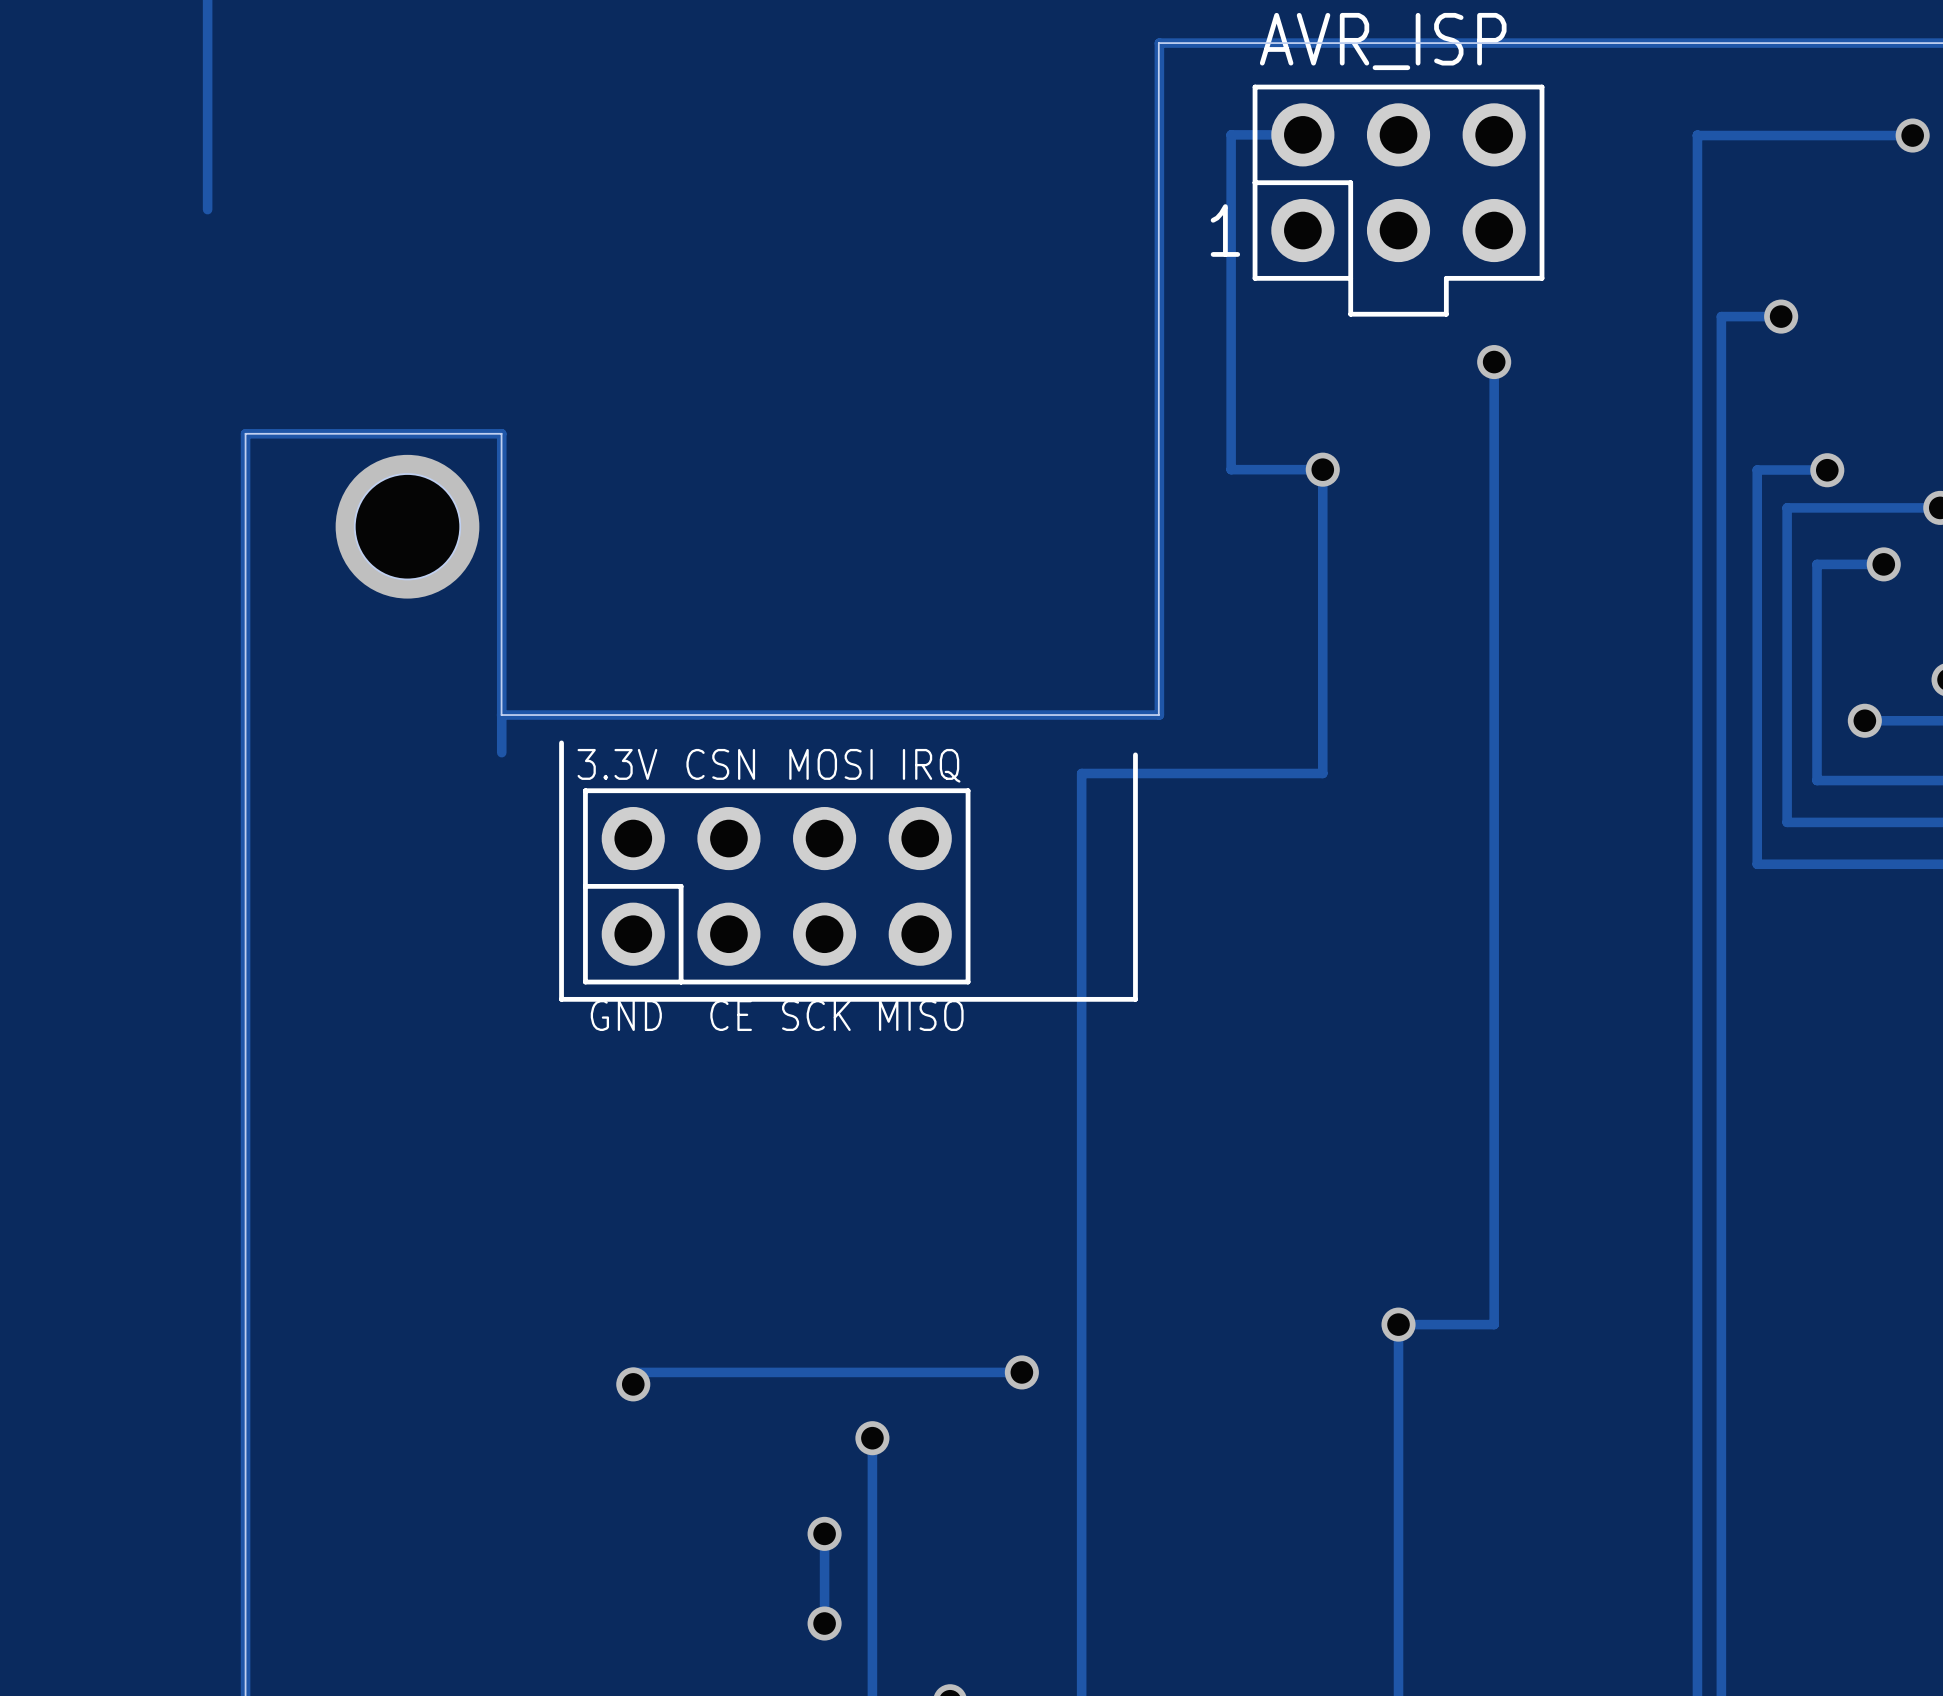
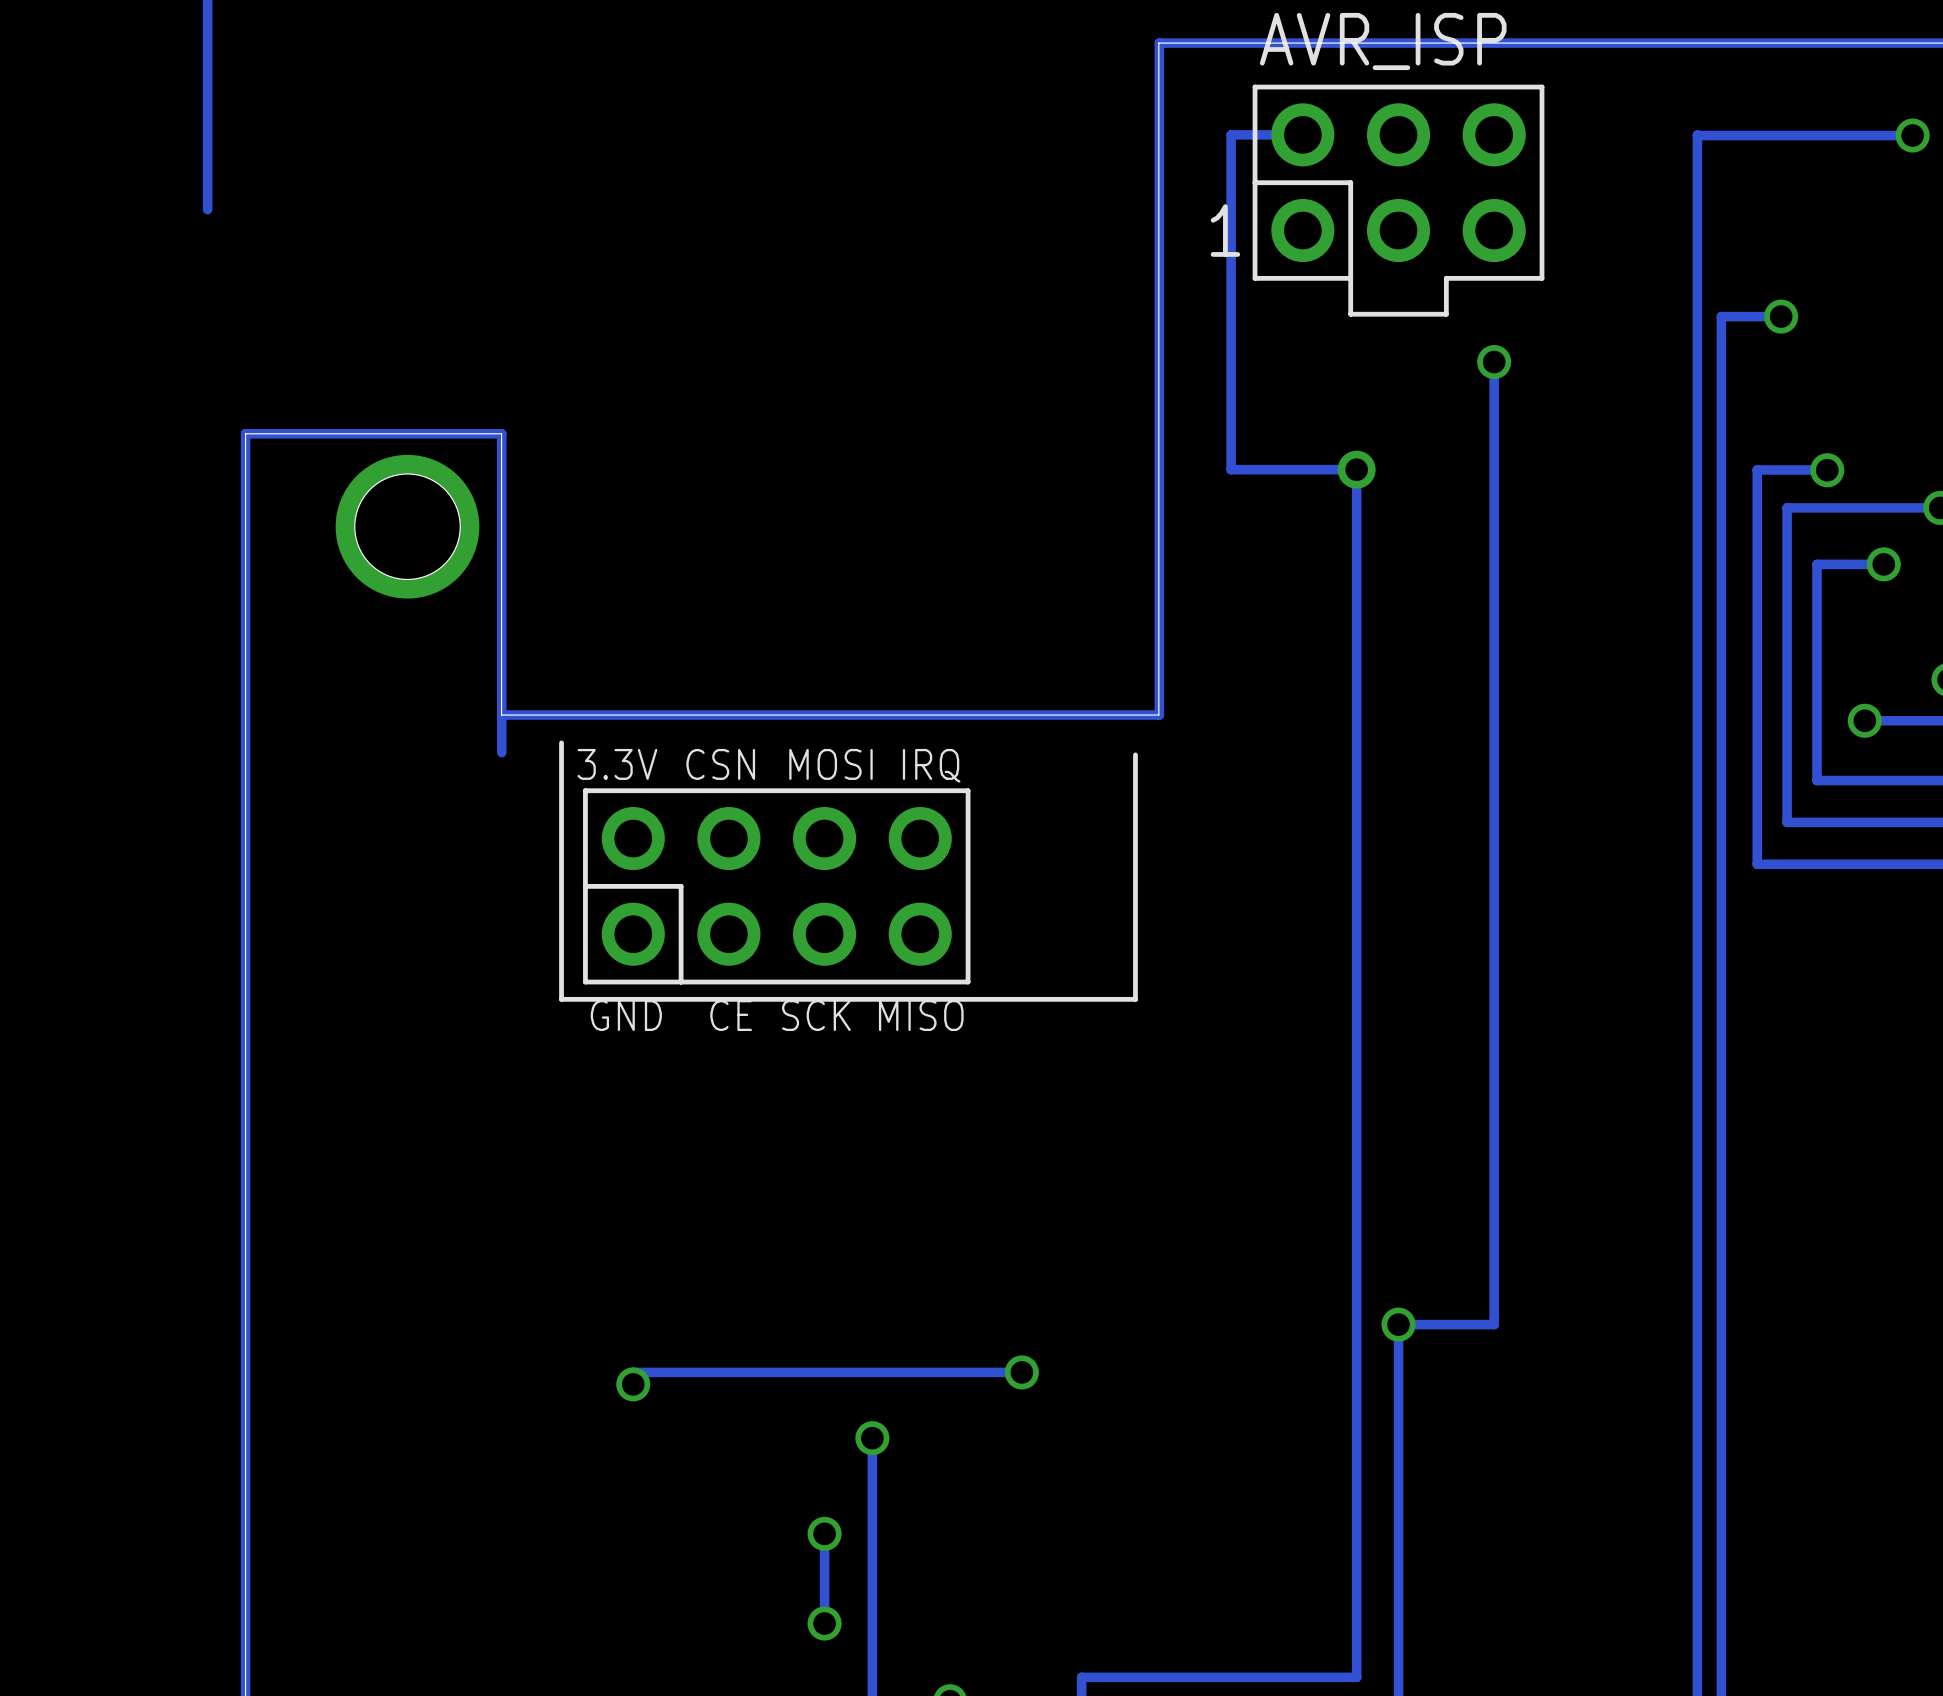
track: (1322, 469) (1322, 773) (1081, 773) (1081, 1677) -> (1322, 469) (1356, 469) (1356, 1677) (1081, 1677)
via position: (1322, 469) -> (1356, 469)

